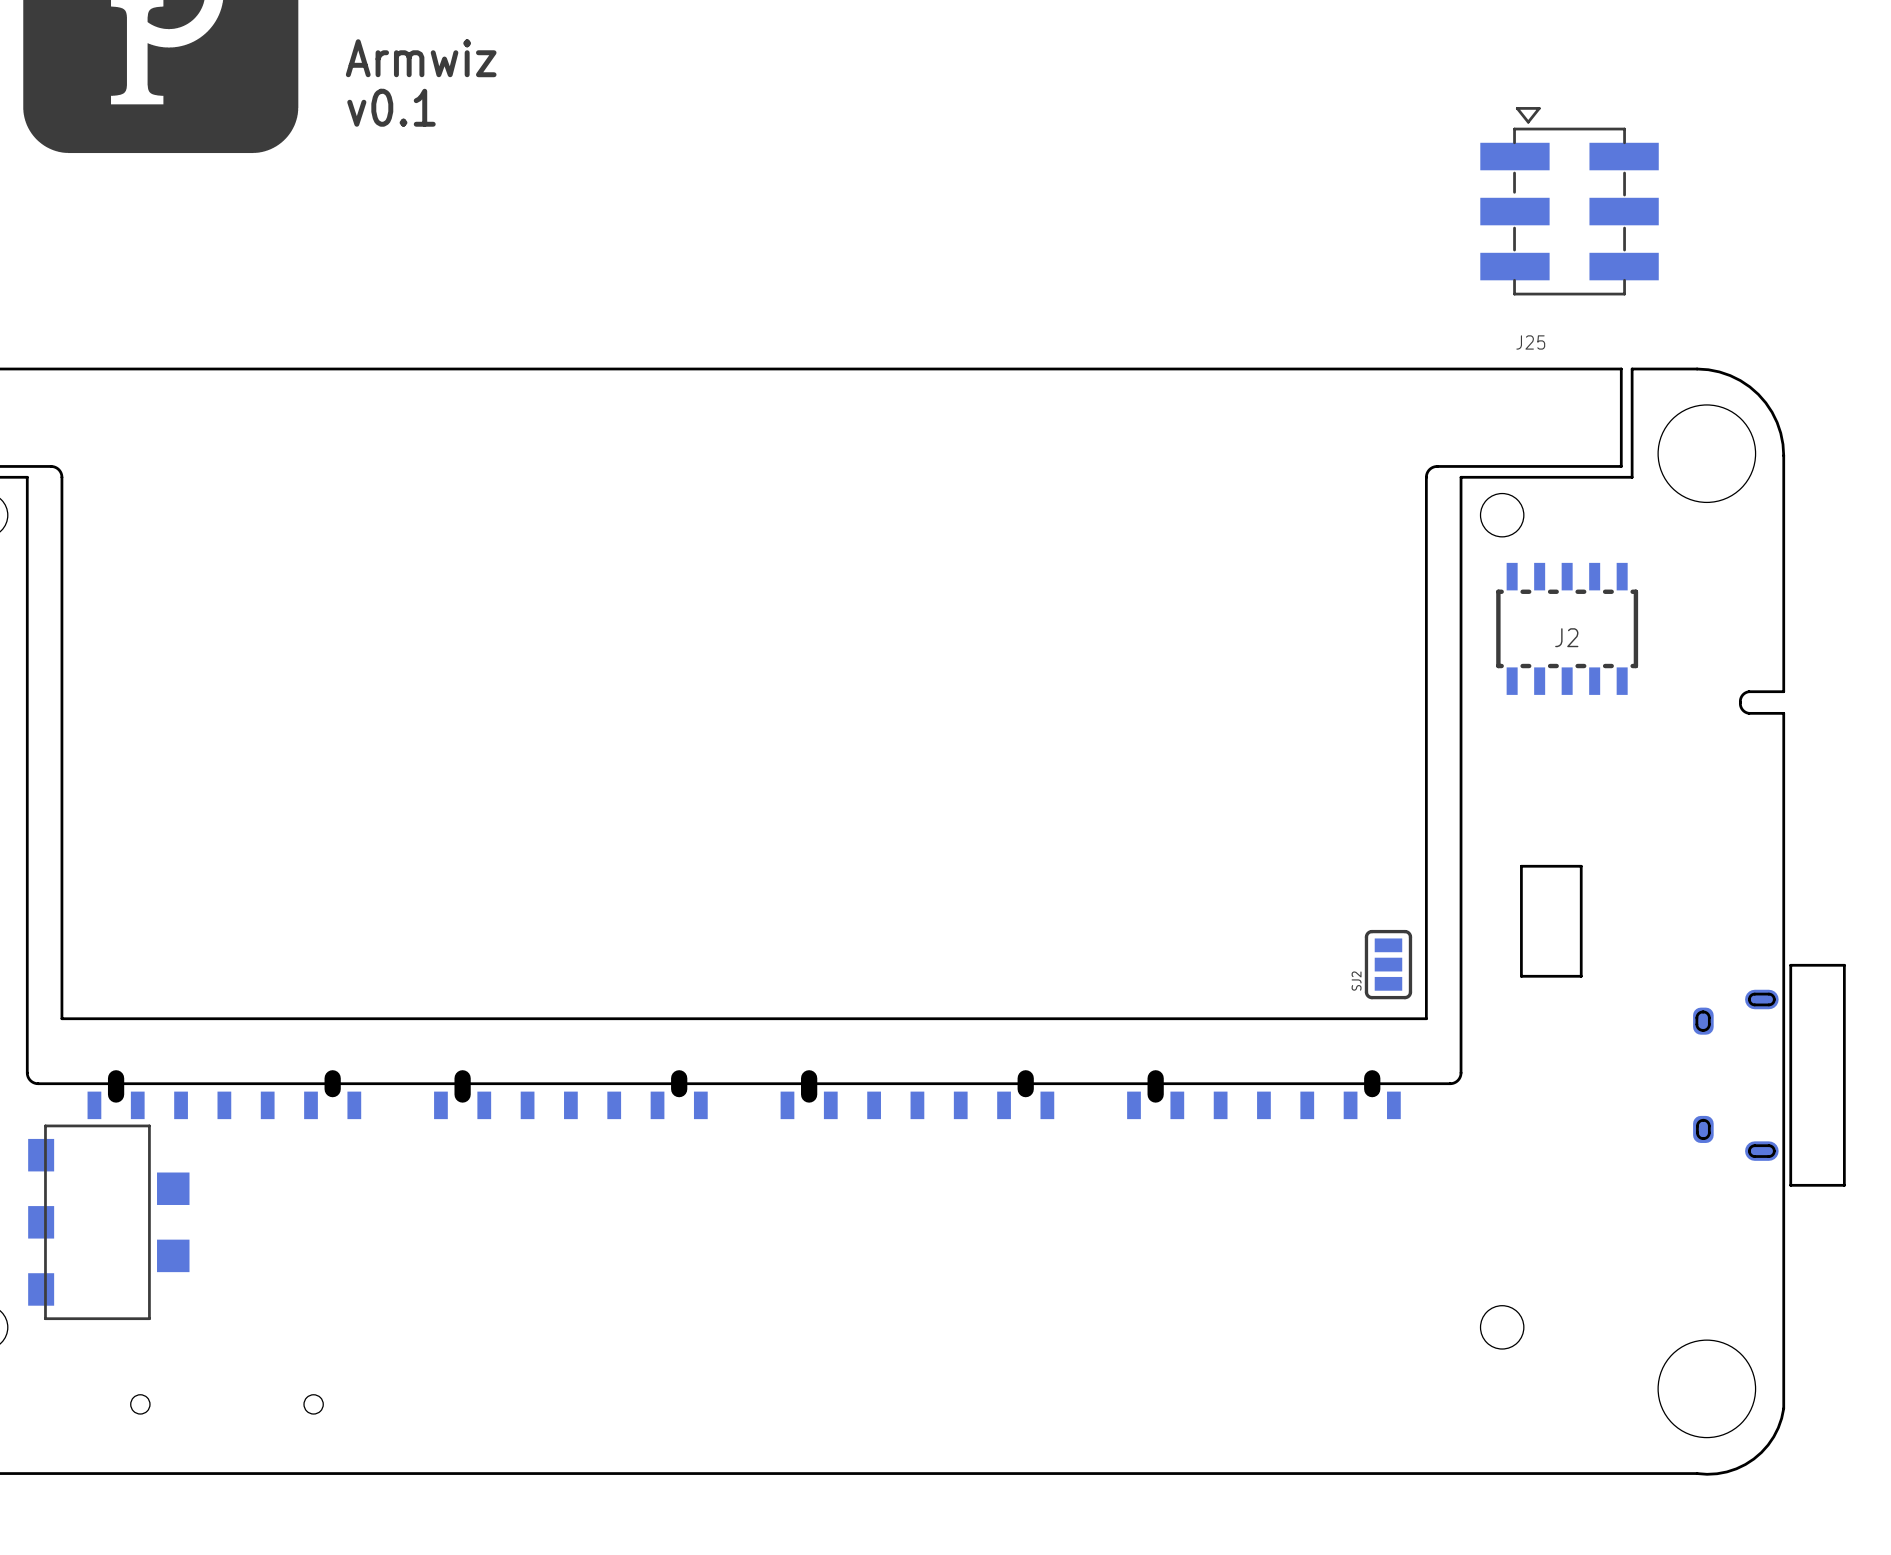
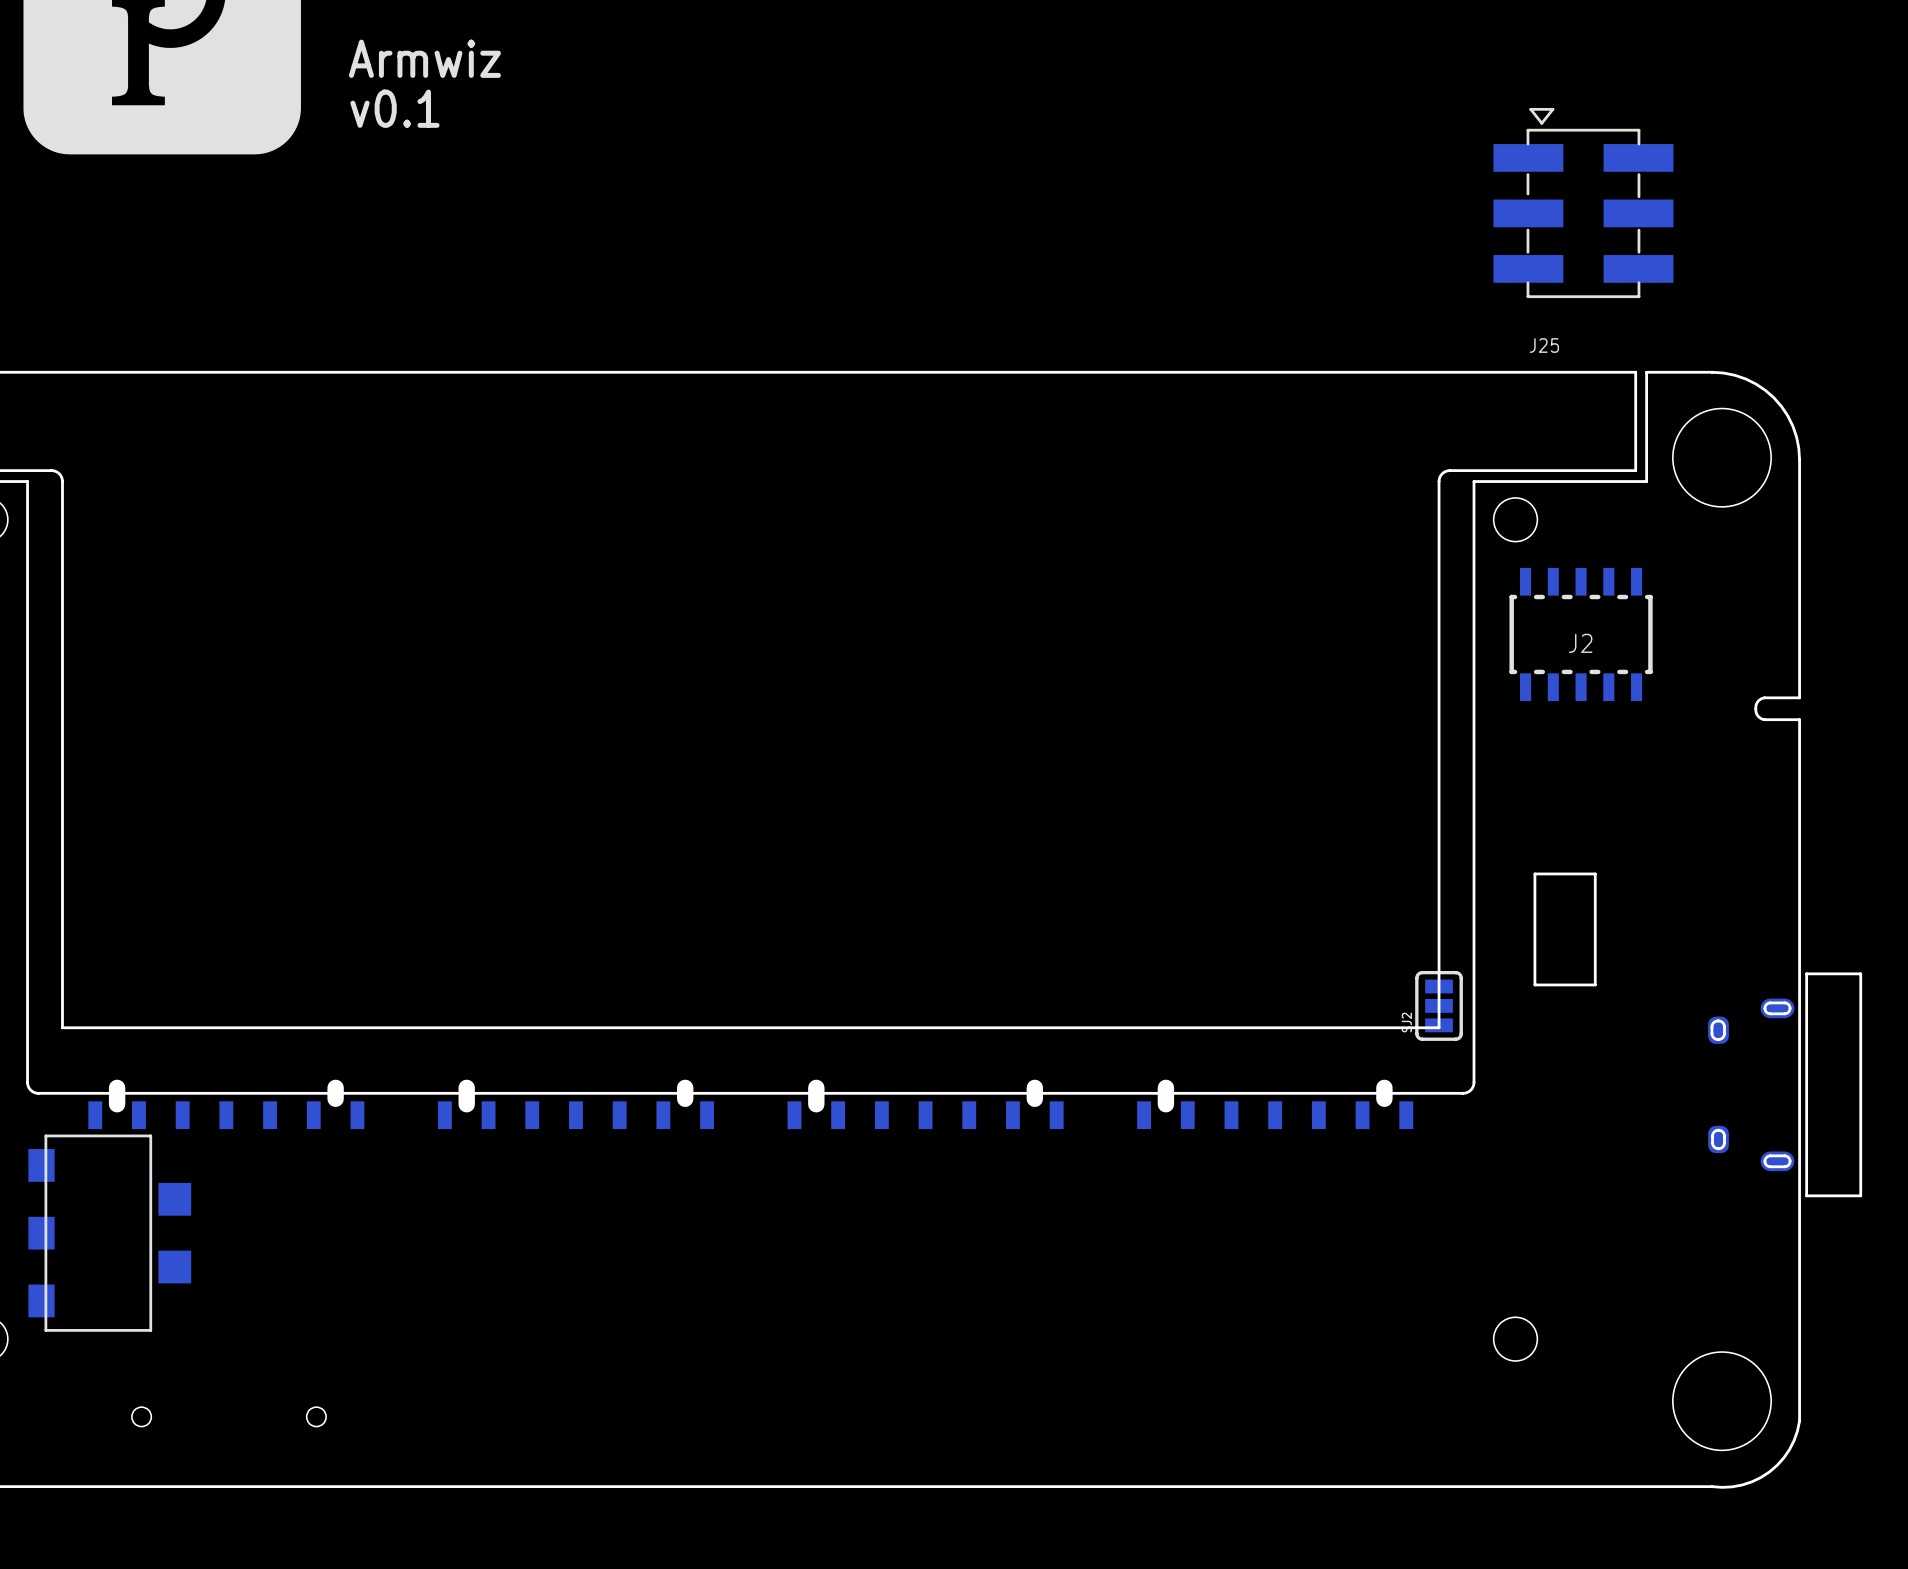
SJ2 position: (1388, 964) -> (1439, 1005)

